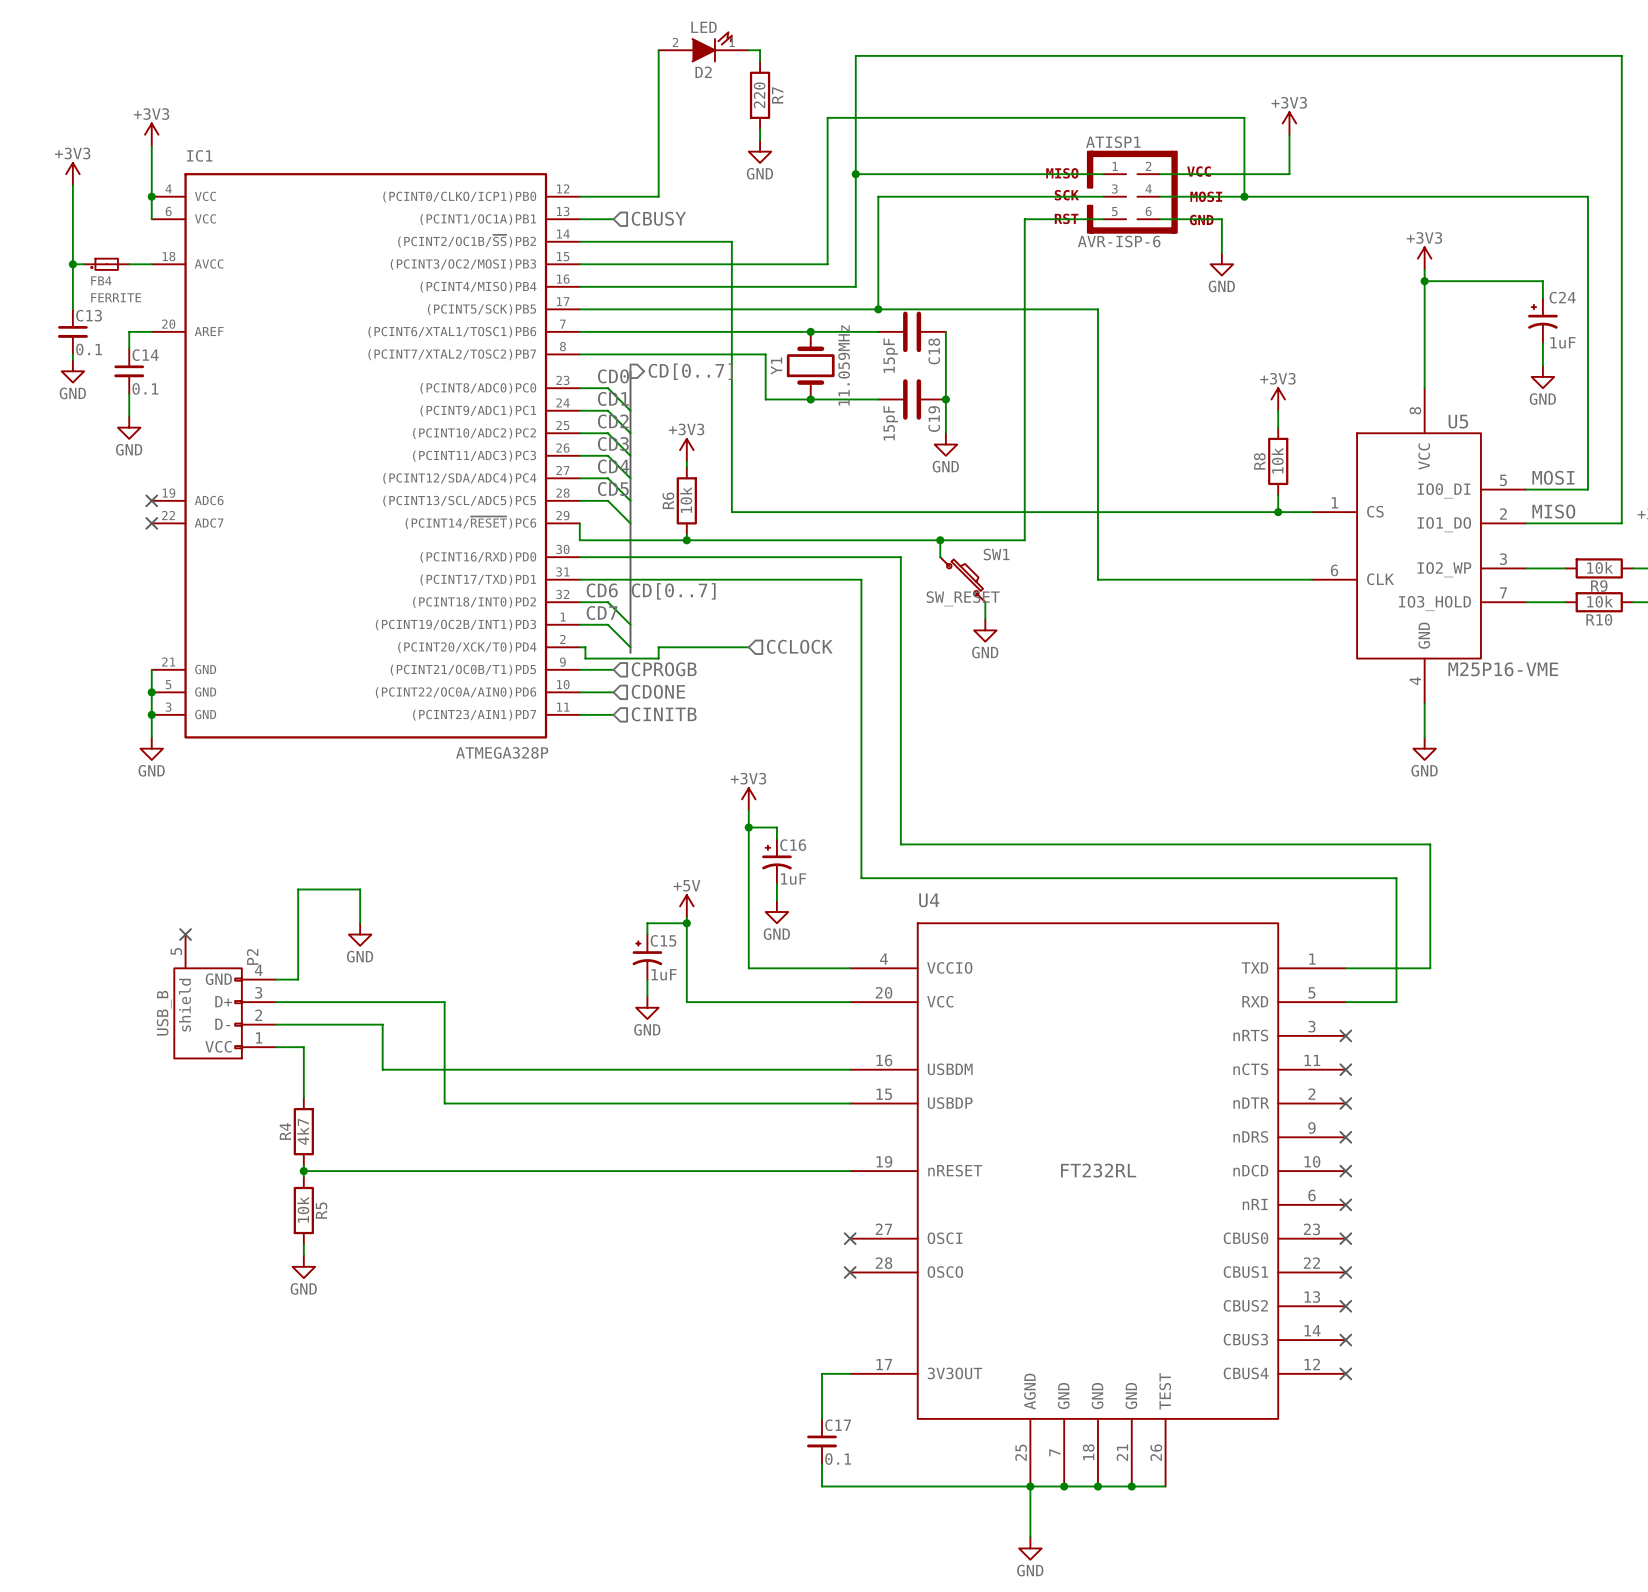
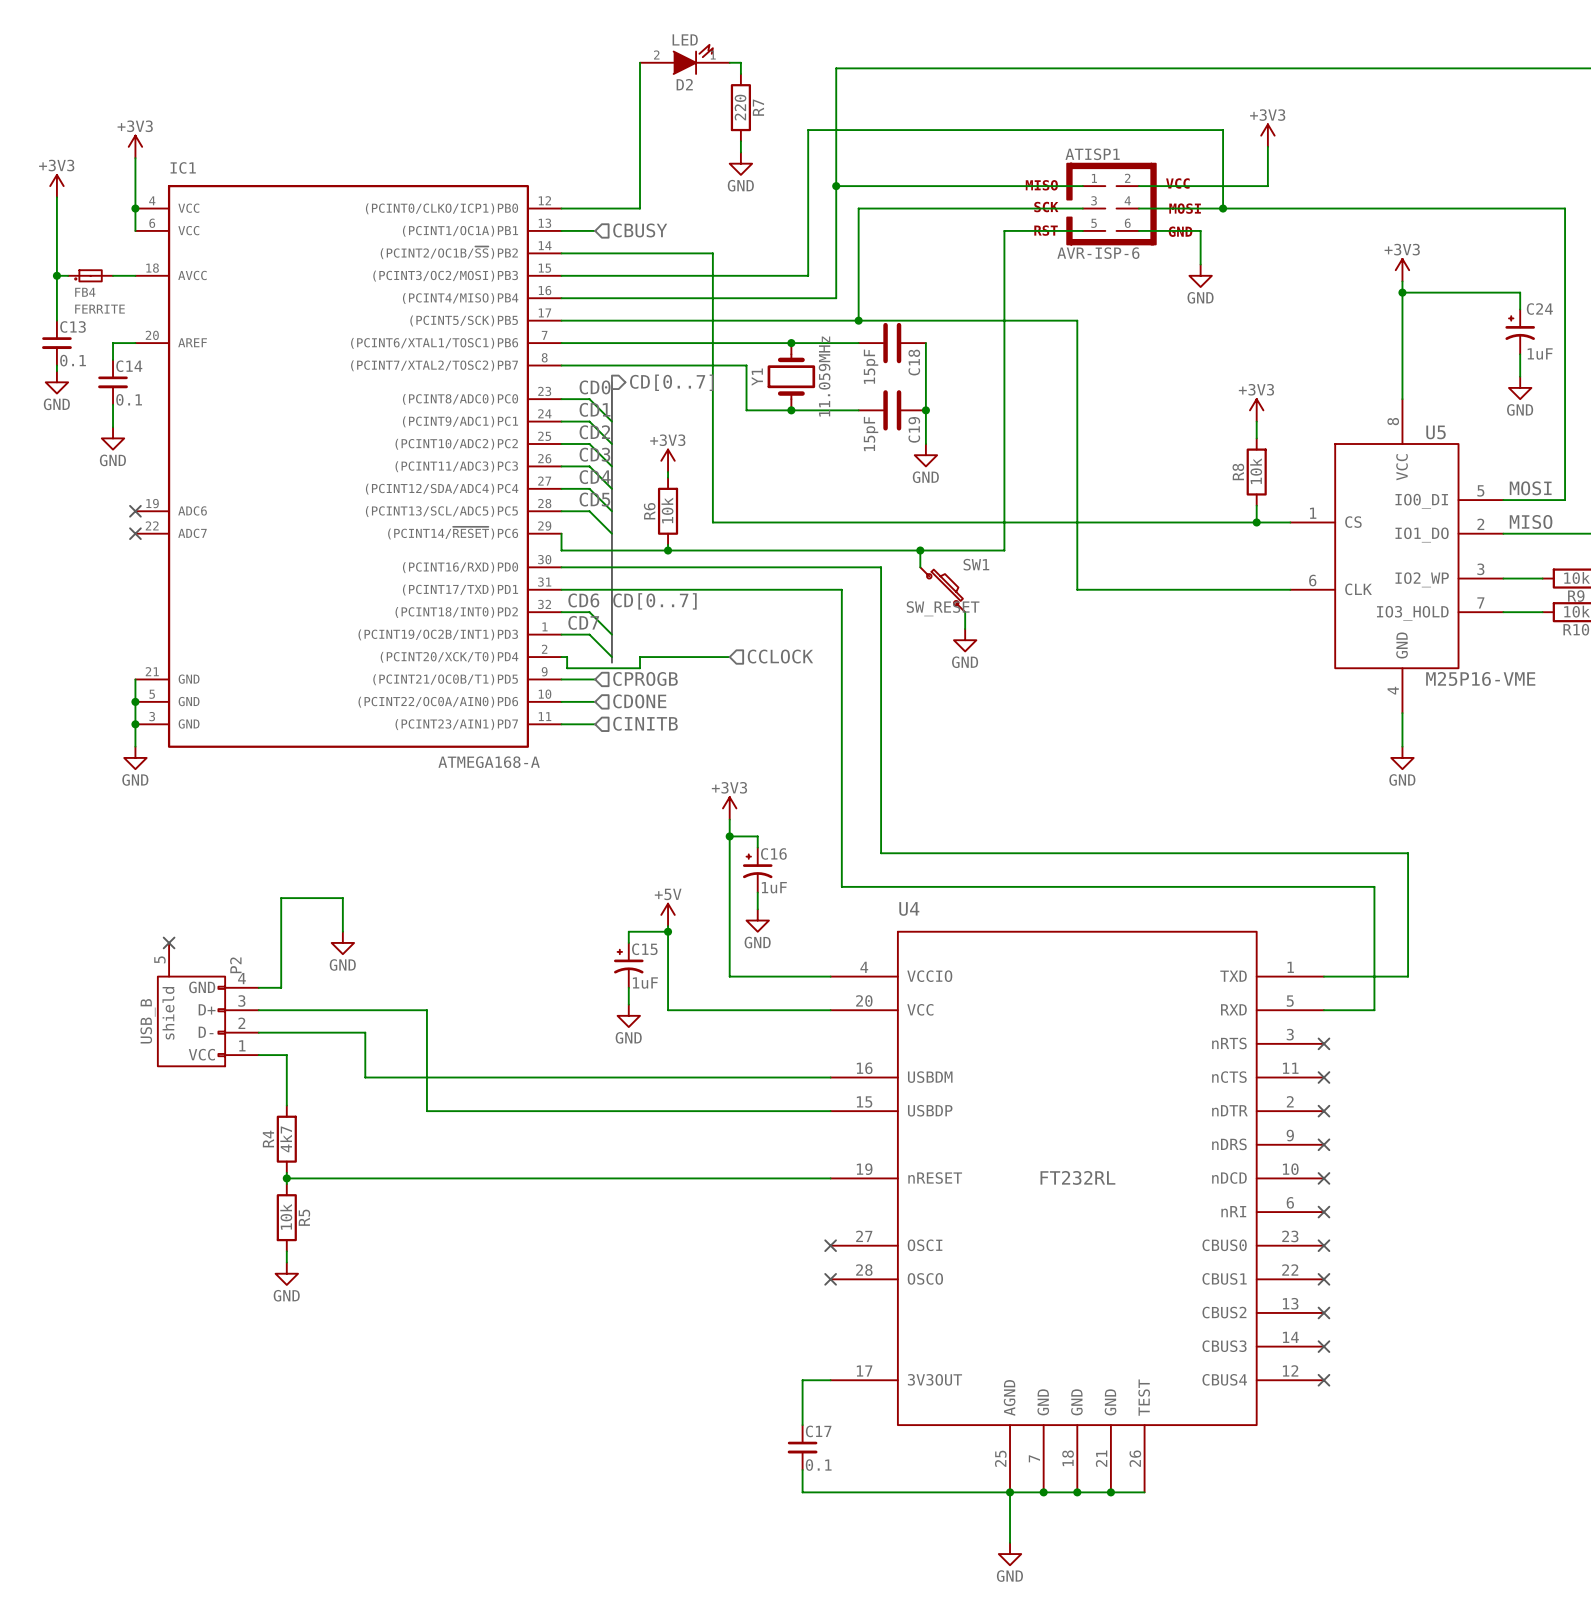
IC1 value: ATMEGA328P (502, 752) -> ATMEGA168-A (489, 762)

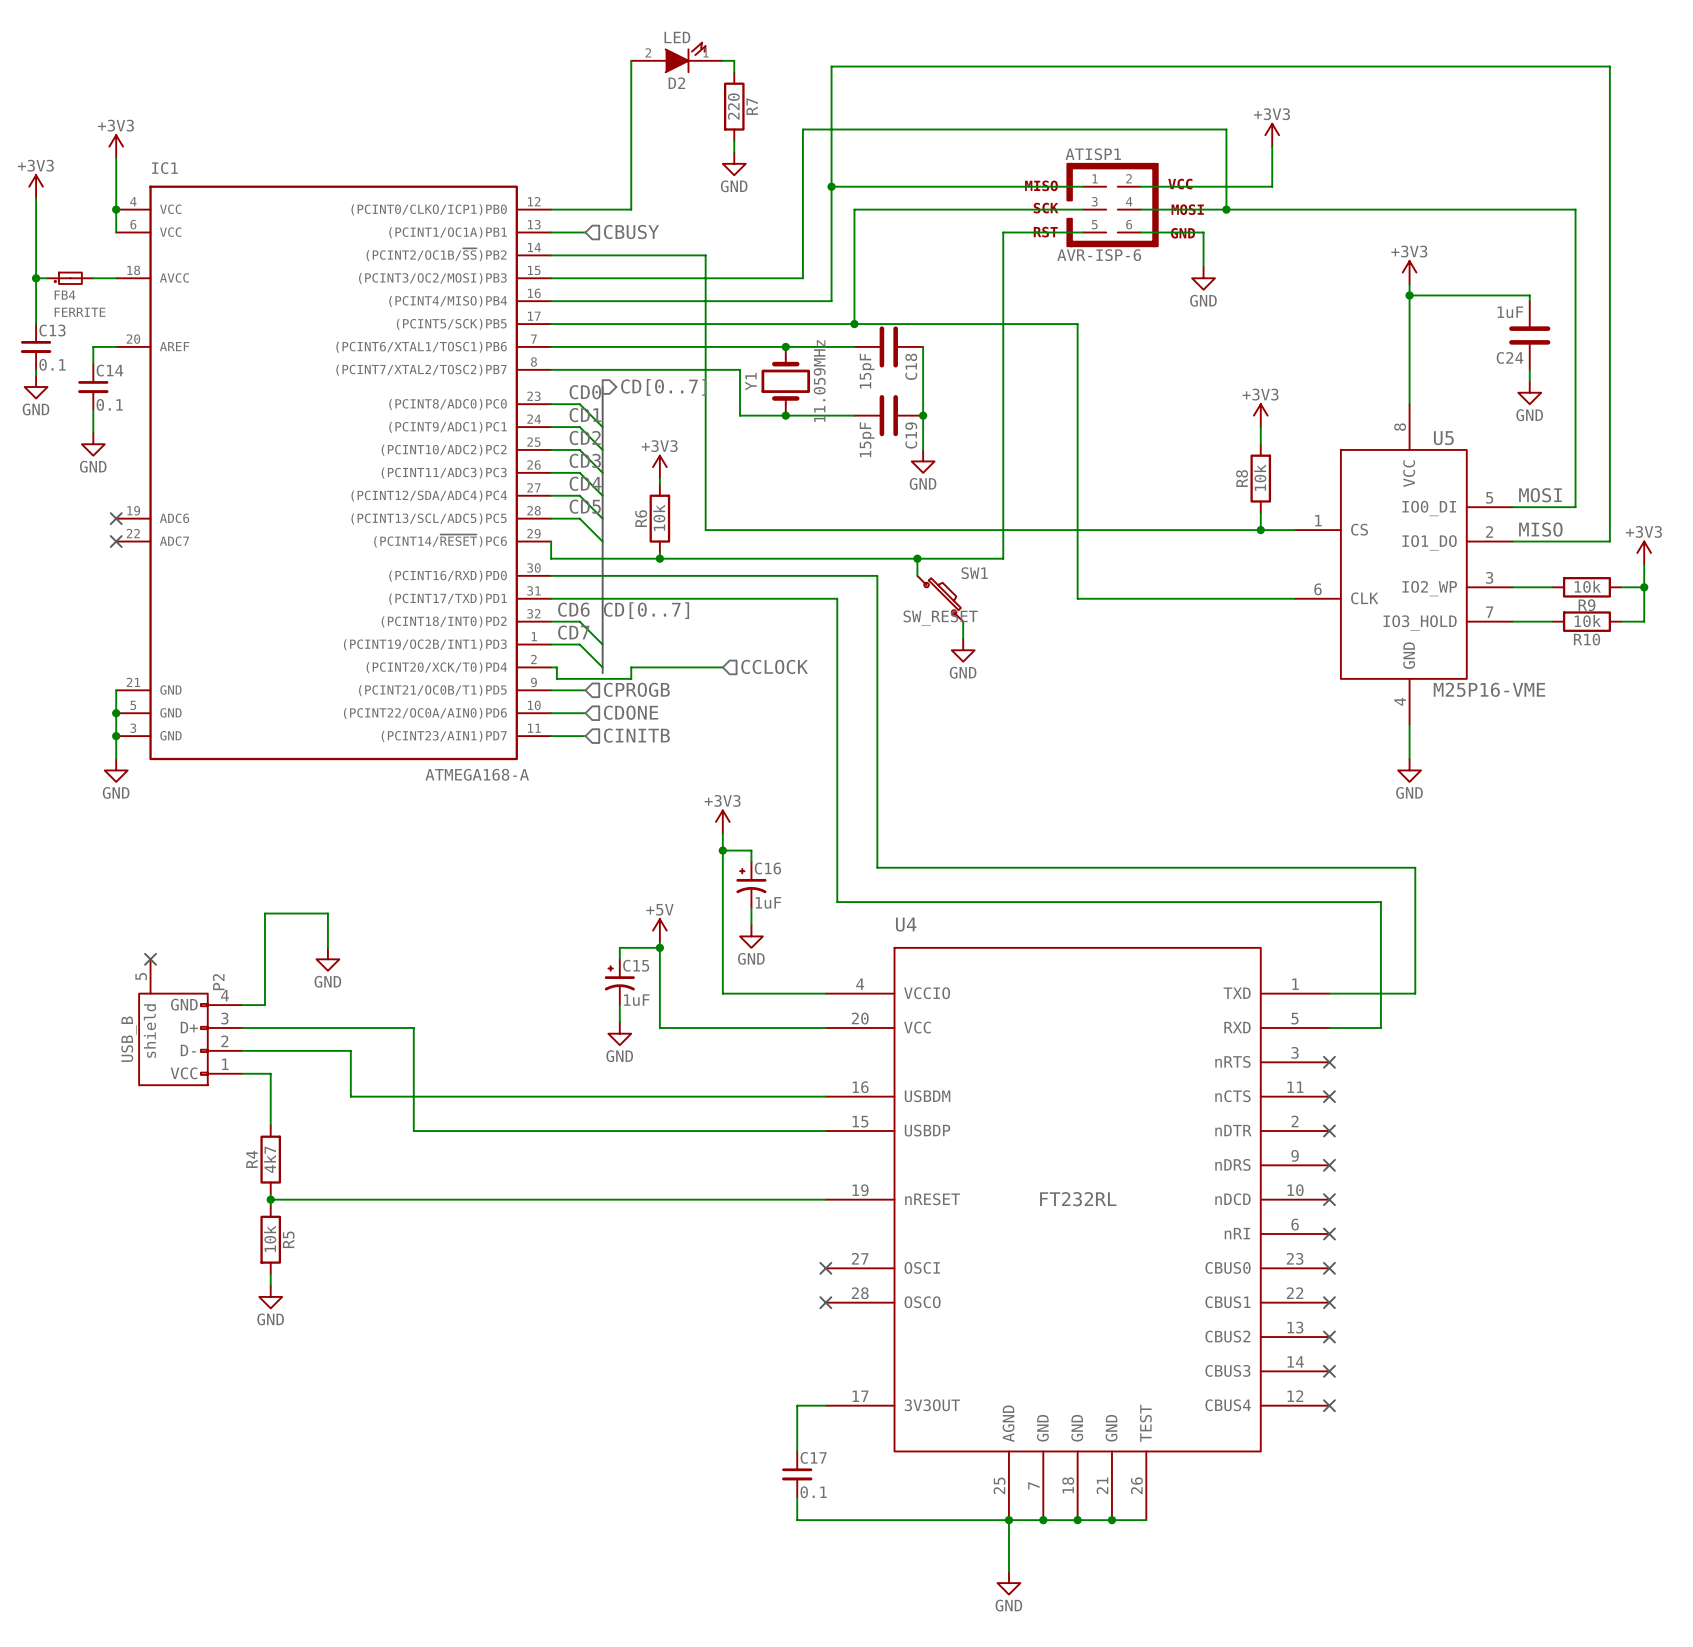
C24 symbol: [1505, 309, 1535, 355] -> [1509, 301, 1551, 370]
C24 name position: C24 (1539, 309) -> C24 (1510, 357)
C24 value position: 1uF (1540, 353) -> 1uF (1510, 312)

